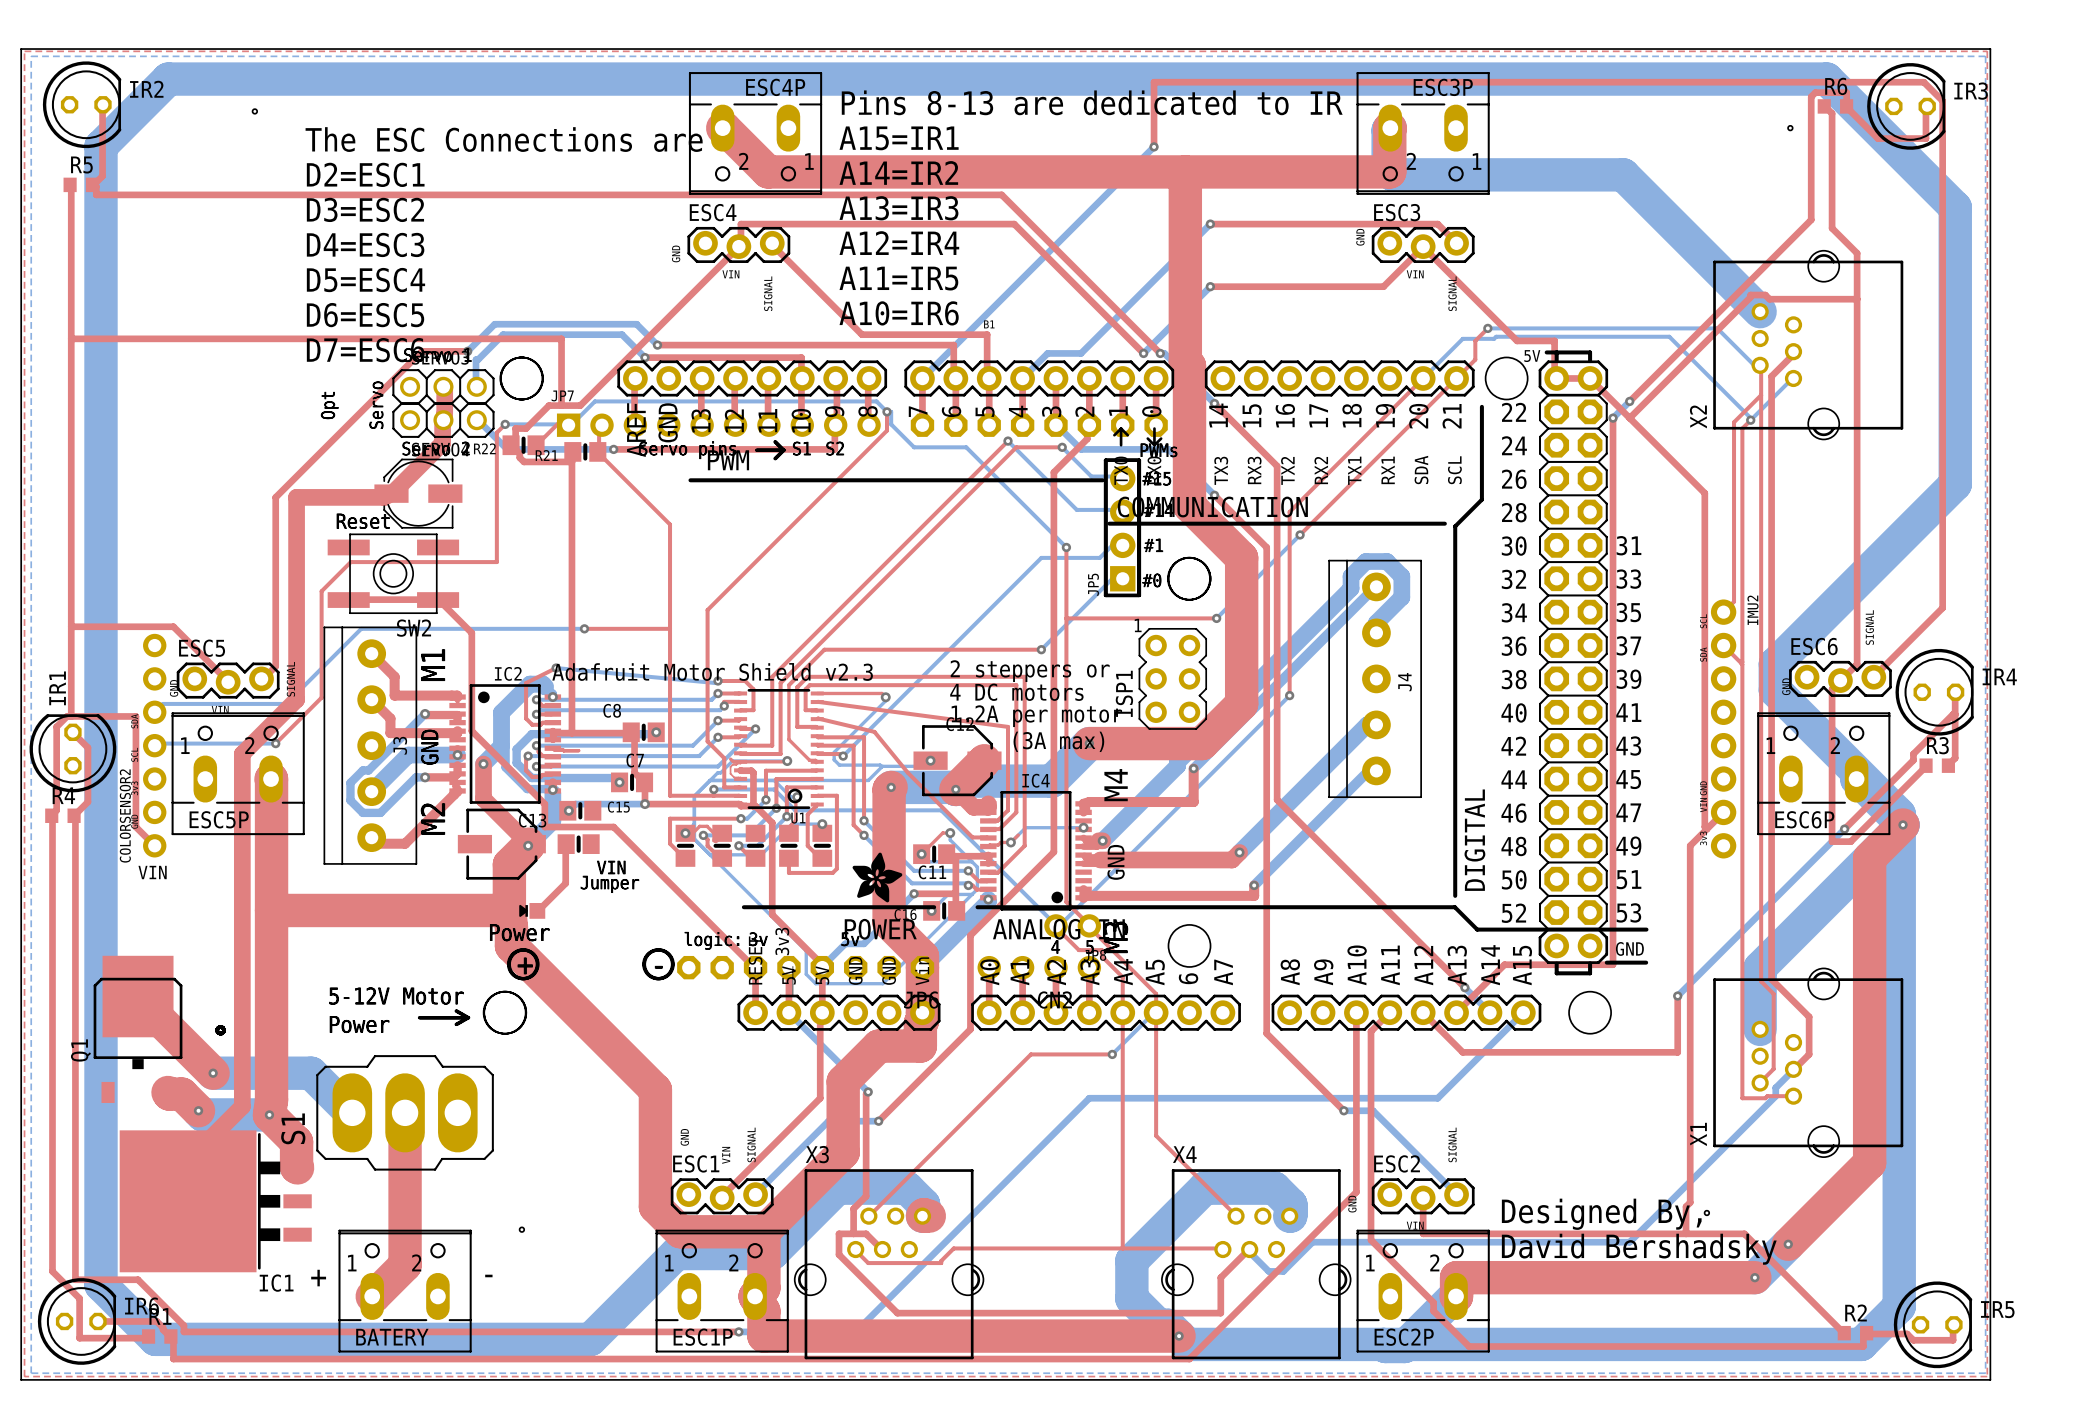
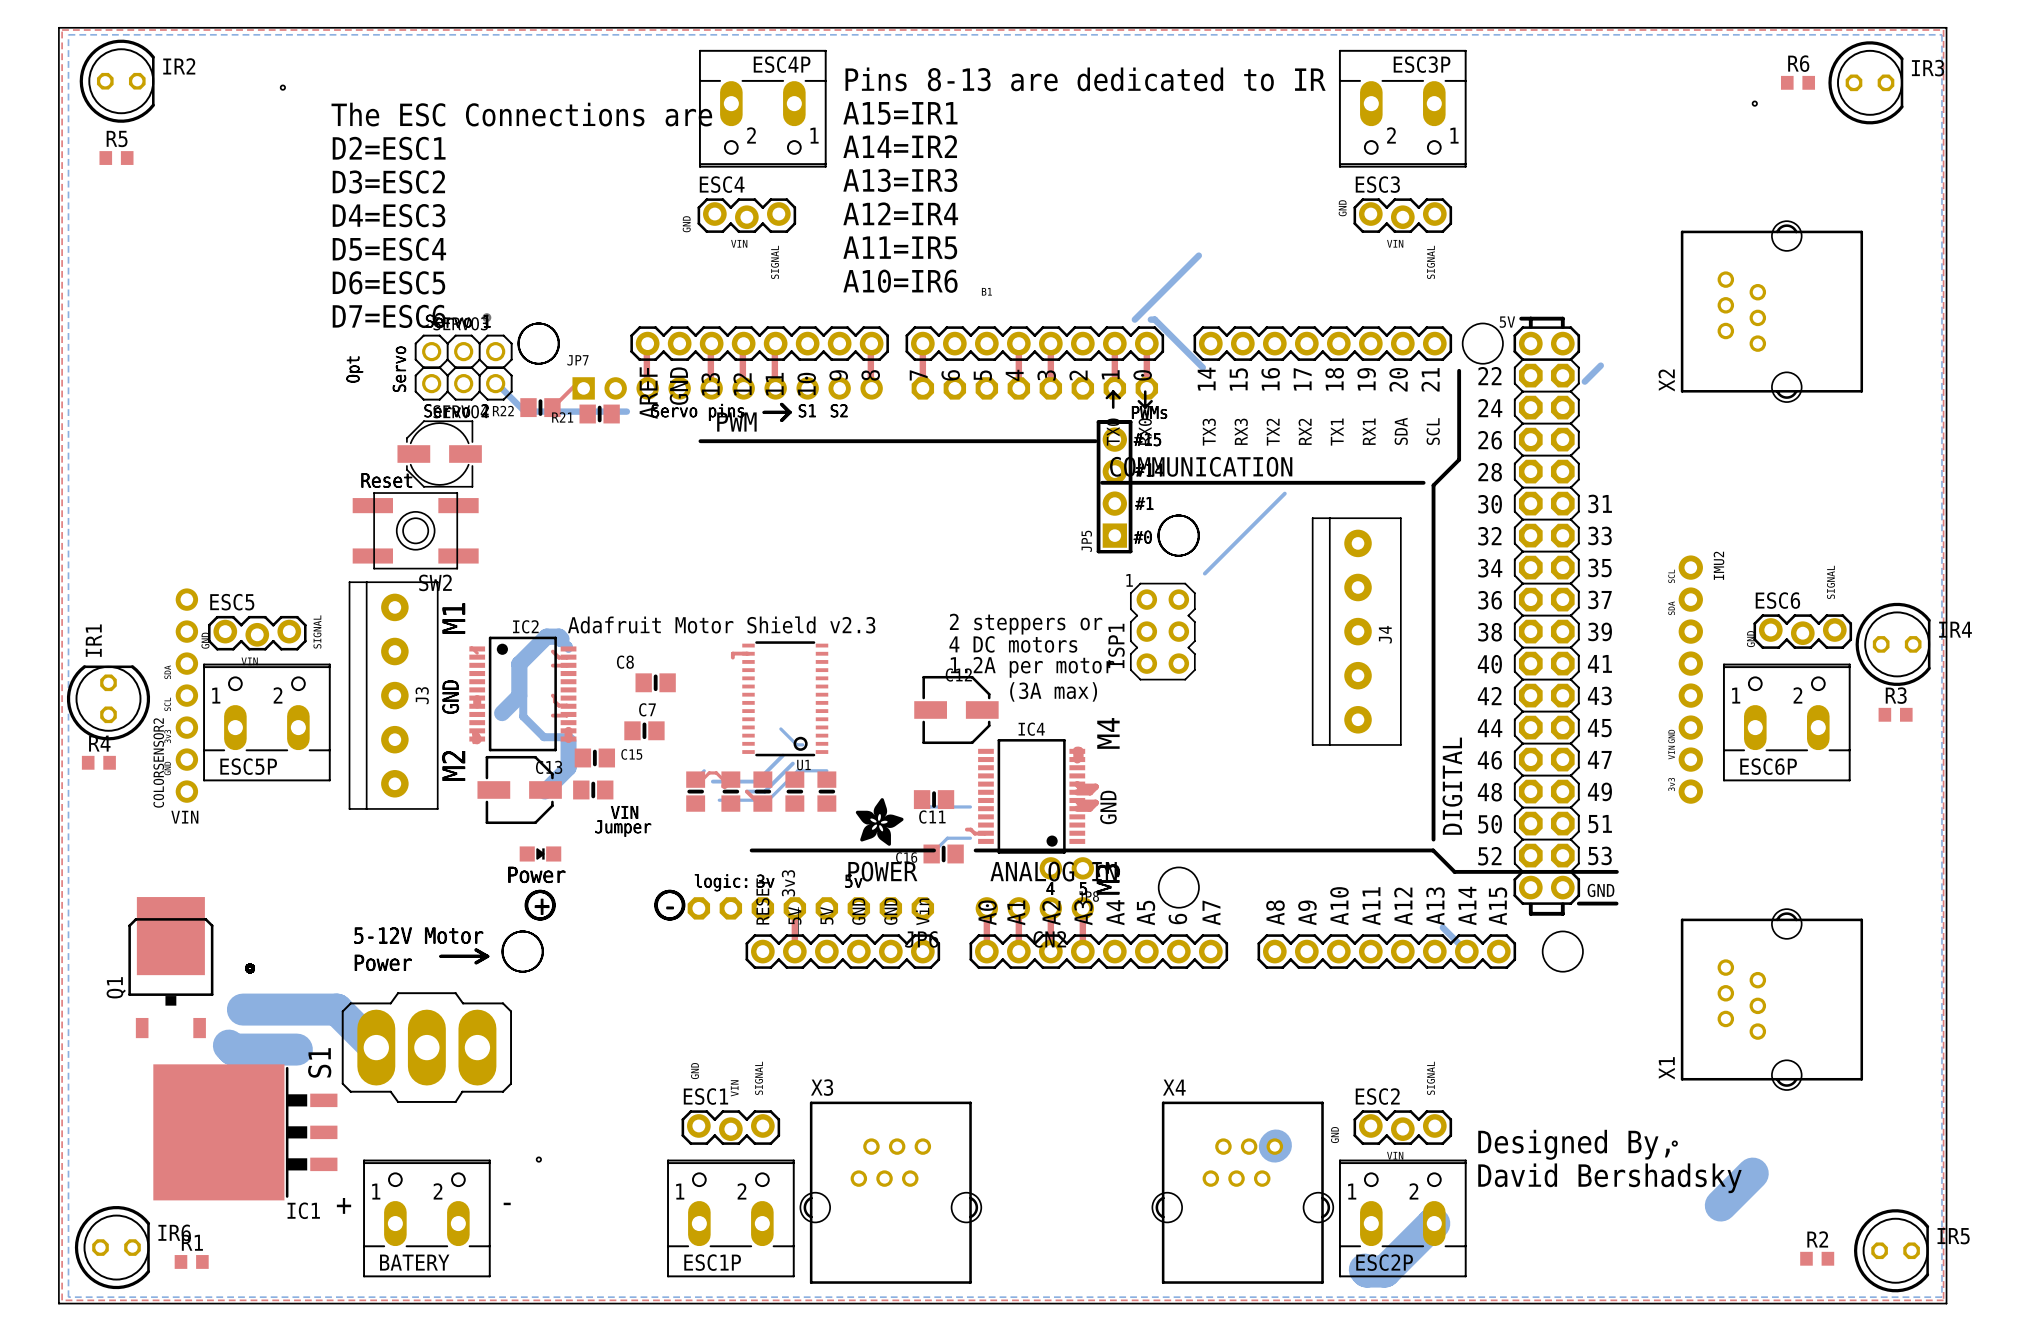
top track: (102, 104) (102, 176) (92, 184) (96, 186) (96, 194) (1001, 194) (1160, 353) -> none
top track: (1824, 106) (1832, 113) (1832, 228) (1857, 253) (1857, 664) (1832, 689) (1832, 841) (1850, 841) (1926, 765) -> none
top track: (1927, 106) (1925, 138) (1877, 138) (1846, 107) (1846, 92) (1815, 92) (1811, 96) (1811, 219) (1629, 401) -> none
top track: (722, 128) (768, 171) (1389, 171) (1390, 128) -> none
bottom track: (1390, 128) (1388, 130) (1388, 169) (1393, 174) (1623, 174) (1760, 311) -> none
top track: (1154, 146) (1154, 82) (1923, 82) (1942, 101) (1942, 607) (1873, 677) -> none
bottom track: (1154, 146) (922, 378) -> none
via: (1154, 146) -> none
top track: (1185, 171) (1185, 361) (1189, 365) (1189, 505) (1241, 557) (1241, 703) (1202, 743) (1089, 743) -> none
top track: (70, 184) (71, 716) -> none
top track: (1210, 224) (1437, 224) (1456, 243) -> none
bottom track: (1210, 224) (1081, 353) (1047, 353) (1022, 378) -> none
via: (1210, 224) -> none
top track: (772, 243) (861, 334) (987, 334) (989, 425) -> none
top track: (1210, 286) (1383, 286) (1423, 246) (1517, 340) (1554, 340) (1554, 376) (1556, 378) (1590, 378) (1704, 493) (1704, 827) (1706, 829) -> none
via: (1210, 286) -> none
top track: (1857, 299) (1769, 299) (1765, 295) (1750, 295) (1629, 418) -> none
top track: (1487, 328) (1475, 340) (1475, 359) (1300, 534) -> none
bottom track: (1487, 328) (1717, 328) (1752, 363) (1760, 365) -> none
via: (1487, 328) -> none
top track: (71, 338) (561, 338) (561, 405) -> none
top track: (657, 345) (953, 345) (955, 425) -> none
bottom track: (657, 345) (636, 324) (494, 324) (467, 351) -> none
via: (657, 345) -> none
top track: (467, 351) (421, 351) (275, 497) (275, 666) (261, 678) -> none
top track: (1793, 351) (1792, 355) (1771, 376) (1771, 979) (1809, 1016) (1809, 1054) (1793, 1069) -> none
top track: (1143, 353) (1014, 224) (740, 224) (740, 244) (580, 405) (549, 405) (526, 428) (515, 428) (515, 445) (511, 445) -> none
via: (1143, 353) -> none
via: (1160, 353) -> none
top track: (644, 357) (801, 357) (802, 425) -> none
bottom track: (644, 357) (622, 334) (503, 334) (476, 359) (476, 386) -> none
via: (644, 357) -> none
top track: (1760, 365) (1761, 981) (1773, 993) (1773, 1069) (1760, 1083) -> none
top track: (835, 378) (836, 422) (834, 426) (834, 449) (613, 449) -> none
top track: (1089, 378) (1089, 425) (1087, 426) (1087, 438) (1053, 472) (1053, 852) (970, 935) (970, 1029) (878, 1121) -> none
top track: (1423, 378) (1289, 512) (1289, 695) -> none
bottom track: (1423, 378) (1462, 338) (1494, 338) (1496, 336) (1669, 336) (1750, 420) (1793, 378) -> none
top track: (443, 386) (444, 413) (442, 420) (442, 443) (392, 493) (384, 497) (296, 497) (296, 699) (242, 754) (242, 1106) (188, 1160) (188, 1201) -> none
top track: (1761, 395) (1734, 422) (1734, 601) (1723, 612) -> none
via: (1629, 401) -> none
top track: (1214, 403) (1277, 466) (1277, 799) (1464, 987) -> none
via: (1214, 403) -> none
top track: (887, 411) (887, 430) (707, 610) (707, 741) (724, 758) (724, 787) (740, 787) -> none
via: (887, 411) -> none
top track: (1613, 418) (1613, 964) (1504, 964) (1456, 1012) -> none
via: (1613, 418) -> none
top track: (1750, 420) (1742, 428) (1741, 663) -> none
via: (1750, 420) -> none
top track: (505, 424) (496, 432) (496, 562) (350, 562) (321, 591) (321, 697) (275, 743) -> none
bottom track: (505, 424) (571, 424) (594, 401) (876, 401) (887, 411) (891, 411) (891, 424) (914, 447) (966, 447) (1066, 547) -> none
via: (505, 424) -> none
top track: (602, 425) (599, 428) (597, 451) (670, 524) (670, 795) (740, 795) -> none
bottom track: (1055, 425) (1081, 449) (1168, 449) (1214, 495) -> none
top track: (1008, 441) (772, 676) (772, 745) (740, 744) -> none
bottom track: (1008, 441) (1076, 509) (1120, 509) (1122, 512) -> none
via: (1008, 441) -> none
top track: (511, 445) (519, 453) (519, 457) (523, 461) (571, 461) -> none
top track: (1062, 447) (1016, 447) (780, 683) (780, 754) (740, 753) -> none
bottom track: (1062, 447) (1091, 476) (1120, 476) (1122, 478) -> none
via: (1062, 447) -> none
via: (613, 449) -> none
top track: (572, 451) (571, 733) -> none
top track: (1214, 495) (1266, 547) (1266, 1033) (1343, 1110) -> none
via: (1214, 495) -> none
via: (1300, 534) -> none
bottom track: (1122, 545) (1112, 545) (1099, 557) (1041, 557) (843, 756) -> none
top track: (1066, 547) (1066, 902) (1156, 993) (1156, 1135) (1236, 1216) -> none
via: (1066, 547) -> none
bottom track: (1122, 578) (1112, 578) (1041, 649) -> none
bottom track: (1376, 586) (1193, 768) -> none
top track: (348, 600) (438, 600) (471, 633) (471, 731) (544, 804) (544, 827) (613, 827) (755, 967) (755, 1012) -> none
top track: (1066, 618) (1216, 618) -> none
via: (1216, 618) -> none
top track: (71, 626) (173, 626) (228, 682) -> none
top track: (584, 628) (670, 628) -> none
bottom track: (584, 628) (361, 628) (286, 703) (163, 703) (154, 712) -> none
via: (584, 628) -> none
bottom track: (1376, 632) (1376, 622) (1401, 597) (1401, 576) (1386, 561) (1365, 561) (1351, 576) (1351, 588) (1177, 761) (1177, 765) (1102, 840) -> none
top track: (1723, 645) (1742, 664) (1742, 1098) (1793, 1096) -> none
top track: (1041, 649) (824, 649) (788, 685) (788, 739) (809, 760) (815, 760) (816, 762) -> none
via: (1041, 649) -> none
top track: (371, 653) (394, 676) (394, 695) (457, 695) (457, 705) -> none
top track: (556, 668) (526, 683) (526, 718) (532, 724) (552, 722) -> none
bottom track: (556, 668) (715, 683) (718, 680) -> none
via: (556, 668) -> none
top track: (718, 680) (745, 680) (753, 689) (753, 710) (740, 710) -> none
via: (718, 680) -> none
top track: (1955, 692) (1955, 758) (1948, 765) -> none
top track: (718, 693) (740, 693) -> none
bottom track: (718, 693) (711, 699) (536, 699) -> none
via: (718, 693) -> none
top track: (817, 693) (881, 693) (885, 697) -> none
bottom track: (1289, 695) (1062, 923) (1055, 923) (1055, 925) -> none
via: (1289, 695) -> none
via: (552, 697) -> none
bottom track: (885, 697) (885, 700) (834, 752) (834, 759) (839, 765) (880, 765) (881, 766) -> none
via: (885, 697) -> none
top track: (371, 699) (390, 718) (390, 733) (457, 733) (457, 731) (457, 739) -> none
via: (536, 699) -> none
top track: (817, 702) (1008, 726) (1008, 810) (997, 820) (988, 820) -> none
bottom track: (724, 706) (720, 710) (540, 710) (536, 714) -> none
via: (724, 706) -> none
top track: (817, 710) (805, 710) (805, 689) (809, 685) (1016, 685) (1016, 812) (999, 829) (988, 829) -> none
top track: (425, 713) (457, 715) (457, 719) -> none
bottom track: (425, 713) (368, 770) (362, 770) (350, 782) (350, 800) (362, 812) (380, 812) (415, 777) (425, 777) -> none
via: (425, 713) -> none
via: (536, 714) -> none
top track: (1955, 714) (1913, 754) (1913, 760) (1844, 829) -> none
top track: (740, 719) (718, 720) -> none
top track: (817, 719) (874, 731) (907, 772) (972, 837) (988, 838) -> none
bottom track: (718, 720) (692, 745) (536, 745) -> none
via: (718, 720) -> none
bottom track: (1376, 724) (1367, 724) (1239, 852) -> none
top track: (740, 727) (755, 728) -> none
top track: (817, 727) (797, 726) (797, 687) (807, 676) (1024, 676) (1024, 845) (997, 872) (988, 872) -> none
bottom track: (755, 728) (718, 766) (536, 766) -> none
via: (755, 728) -> none
top track: (72, 732) (87, 747) (87, 801) (74, 815) (75, 1279) (138, 1279) (183, 1325) (183, 1331) (738, 1331) -> none
bottom track: (656, 732) (654, 734) (531, 734) (516, 749) (516, 762) (531, 778) (615, 778) (619, 782) -> none
via: (656, 732) -> none
top track: (740, 736) (718, 737) -> none
top track: (817, 736) (864, 737) (864, 820) -> none
bottom track: (718, 737) (699, 756) (528, 756) -> none
via: (718, 737) -> none
top track: (552, 739) (552, 731) (555, 733) (634, 733) (634, 772) (644, 782) (644, 804) (738, 804) (740, 806) (755, 806) (772, 822) (772, 914) (822, 964) (820, 1098) (722, 1197) -> none
bottom track: (275, 743) (156, 743) (154, 745) -> none
via: (275, 743) -> none
bottom track: (1089, 743) (1051, 781) (970, 781) (955, 789) (953, 787) (891, 787) -> none
via: (1089, 743) -> none
top track: (817, 744) (853, 745) (853, 824) (864, 835) -> none
via: (536, 745) -> none
top track: (552, 748) (578, 750) -> none
top track: (817, 753) (843, 754) (843, 756) -> none
bottom track: (457, 755) (408, 755) (371, 791) -> none
via: (457, 755) -> none
top track: (528, 756) (526, 758) (526, 770) (532, 776) (552, 773) -> none
via: (528, 756) -> none
via: (843, 756) -> none
top track: (730, 759) (733, 761) (787, 761) -> none
bottom track: (930, 760) (924, 766) (882, 766) (868, 780) (710, 780) -> none
via: (930, 760) -> none
top track: (984, 760) (955, 789) (973, 807) (988, 807) (988, 803) (988, 812) -> none
top track: (740, 761) (730, 766) (730, 773) (734, 777) (738, 777) -> none
bottom track: (787, 761) (732, 761) (720, 772) (717, 772) (694, 796) (694, 839) (806, 950) (806, 974) (815, 983) (882, 983) (977, 889) (977, 867) (950, 840) (950, 833) -> none
via: (787, 761) -> none
top track: (483, 764) (483, 798) (528, 844) (509, 864) (509, 910) -> none
via: (483, 764) -> none
top track: (457, 765) (457, 773) (454, 777) (425, 777) -> none
via: (536, 766) -> none
top track: (1193, 768) (1193, 801) (1089, 801) (1083, 803) -> none
via: (1193, 768) -> none
top track: (740, 770) (751, 770) (753, 772) (753, 806) -> none
top track: (817, 770) (765, 770) (765, 799) -> none
bottom track: (1376, 770) (1375, 772) (1366, 772) (1254, 885) -> none
via: (425, 777) -> none
top track: (817, 778) (776, 779) (776, 808) -> none
top track: (271, 779) (271, 1100) (269, 1114) (296, 1142) (297, 1167) -> none
bottom track: (1856, 779) (1903, 824) (1760, 967) (1760, 1029) -> none
top track: (457, 782) (457, 791) (405, 843) (371, 843) (371, 837) -> none
via: (619, 782) -> none
top track: (817, 787) (786, 787) (786, 816) -> none
top track: (891, 787) (889, 789) (889, 923) (922, 956) (922, 1021) (920, 1023) (920, 1046) (878, 1046) (843, 1081) (843, 1152) (763, 1231) -> none
via: (891, 787) -> none
via: (552, 789) -> none
bottom track: (713, 789) (774, 789) (795, 810) (941, 810) (1055, 925) -> none
via: (713, 789) -> none
via: (955, 789) -> none
top track: (817, 795) (836, 795) (836, 868) (832, 872) (788, 872) (788, 858) -> none
top track: (797, 797) (795, 820) (788, 827) (788, 833) -> none
via: (797, 797) -> none
bottom track: (765, 799) (747, 818) (740, 818) -> none
via: (765, 799) -> none
bottom track: (644, 804) (575, 804) (568, 810) -> none
via: (644, 804) -> none
top track: (817, 804) (807, 814) (807, 845) (818, 856) (822, 856) (822, 858) -> none
via: (776, 808) -> none
via: (568, 810) -> none
top track: (1723, 812) (1690, 845) (1690, 1202) (1686, 1206) (1686, 1233) -> none
via: (786, 816) -> none
top track: (740, 818) (670, 818) (670, 843) (685, 858) -> none
via: (740, 818) -> none
bottom track: (864, 820) (914, 870) (968, 870) -> none
via: (864, 820) -> none
via: (822, 824) -> none
top track: (1903, 824) (1869, 858) (1869, 1162) (1788, 1244) -> none
via: (1903, 824) -> none
bottom track: (1083, 827) (1025, 827) (1010, 842) -> none
via: (1083, 827) -> none
bottom track: (1844, 829) (1677, 996) -> none
via: (1844, 829) -> none
via: (685, 833) -> none
top track: (950, 833) (942, 833) (921, 854) -> none
via: (950, 833) -> none
top track: (703, 835) (707, 839) (707, 845) (718, 856) (722, 856) (722, 858) -> none
via: (703, 835) -> none
bottom track: (864, 835) (912, 883) (966, 883) (968, 885) -> none
via: (864, 835) -> none
top track: (1018, 835) (1010, 842) (1000, 842) (998, 844) (988, 846) -> none
via: (1102, 840) -> none
via: (1010, 842) -> none
top track: (566, 844) (565, 883) (537, 910) -> none
top track: (154, 845) (135, 827) (135, 716) (67, 716) (56, 726) (56, 810) (51, 815) (52, 1271) (79, 1298) (79, 1338) (148, 1338) (148, 1336) -> none
via: (528, 845) -> none
via: (738, 845) -> none
top track: (1239, 852) (1232, 859) (1100, 859) -> none
via: (1239, 852) -> none
via: (921, 854) -> none
top track: (946, 854) (947, 856) (988, 855) (988, 863) -> none
top track: (955, 856) (956, 910) -> none
top track: (968, 870) (978, 881) (988, 880) -> none
via: (968, 870) -> none
via: (968, 885) -> none
top track: (1254, 885) (1254, 895) (1085, 895) (1083, 897) (1083, 889) -> none
via: (1254, 885) -> none
top track: (914, 893) (955, 893) -> none
bottom track: (914, 893) (864, 943) (845, 943) (822, 967) -> none
via: (914, 893) -> none
bottom track: (988, 899) (988, 901) (922, 967) -> none
via: (988, 899) -> none
top track: (271, 910) (509, 910) -> none
top track: (509, 910) (511, 945) (655, 1089) (655, 1206) (680, 1231) (763, 1231) -> none
via: (931, 910) -> none
top track: (1055, 925) (1078, 950) (1101, 950) (1101, 956) (1122, 977) (1122, 1248) -> none
via: (1464, 987) -> none
top track: (138, 996) (213, 1073) -> none
top track: (1677, 996) (1677, 1052) (1462, 1052) (1423, 1012) -> none
via: (1677, 996) -> none
bottom track: (788, 1012) (868, 1091) -> none
bottom track: (1156, 1012) (1112, 1054) -> none
top track: (1356, 1012) (1356, 1192) (1189, 1359) (173, 1359) (173, 1338) (156, 1321) (97, 1321) -> none
top track: (1389, 1012) (1371, 1031) (1371, 1240) (1433, 1302) (1433, 1311) (1469, 1346) (1863, 1346) (1863, 1333) (1866, 1333) (1907, 1333) (1913, 1340) (1953, 1340) (1953, 1324) -> none
bottom track: (1523, 1012) (1437, 1098) (1089, 1098) (855, 1331) (738, 1331) -> none
top track: (1112, 1054) (1030, 1054) (868, 1216) -> none
via: (1112, 1054) -> none
bottom track: (1793, 1069) (1775, 1087) (1775, 1096) (1629, 1242) (1312, 1242) (1283, 1271) (1268, 1271) (1247, 1250) (1249, 1249) -> none
via: (213, 1073) -> none
top track: (868, 1091) (866, 1094) (866, 1196) (853, 1208) (853, 1233) -> none
via: (868, 1091) -> none
top track: (167, 1092) (181, 1094) (198, 1110) -> none
via: (198, 1110) -> none
bottom track: (1343, 1110) (1373, 1110) (1456, 1194) -> none
via: (1343, 1110) -> none
top track: (405, 1112) (405, 1265) (372, 1296) -> none
via: (269, 1114) -> none
bottom track: (878, 1121) (828, 1121) (755, 1194) -> none
via: (878, 1121) -> none
top track: (1423, 1197) (1423, 1233) (1744, 1233) (1844, 1333) -> none
top track: (930, 1214) (922, 1216) -> none
bottom track: (923, 1216) (923, 1204) (907, 1188) (837, 1188) (772, 1253) (676, 1253) (590, 1339) (155, 1339) (100, 1284) (100, 146) (168, 79) (1826, 79) (1955, 207) (1955, 484) (1775, 664) (1775, 690) (1899, 814) (1899, 1306) (1861, 1344) (1187, 1344) (1168, 1325) (1158, 1325) (1131, 1298) (1131, 1260) (1204, 1188) (1274, 1188) (1290, 1204) (1290, 1216) -> none
top track: (763, 1231) (763, 1288) (755, 1296) (763, 1311) (763, 1336) (1179, 1336) -> none
via: (1788, 1244) -> none
top track: (855, 1249) (868, 1263) (941, 1263) (953, 1248) (1222, 1249) -> none
top track: (882, 1249) (866, 1233) (839, 1233) (839, 1254) (897, 1313) (1220, 1313) (1220, 1277) (1249, 1249) -> none
top track: (1754, 1277) (1456, 1277) (1456, 1296) -> none
via: (1754, 1277) -> none
via: (738, 1331) -> none
via: (1179, 1336) -> none

